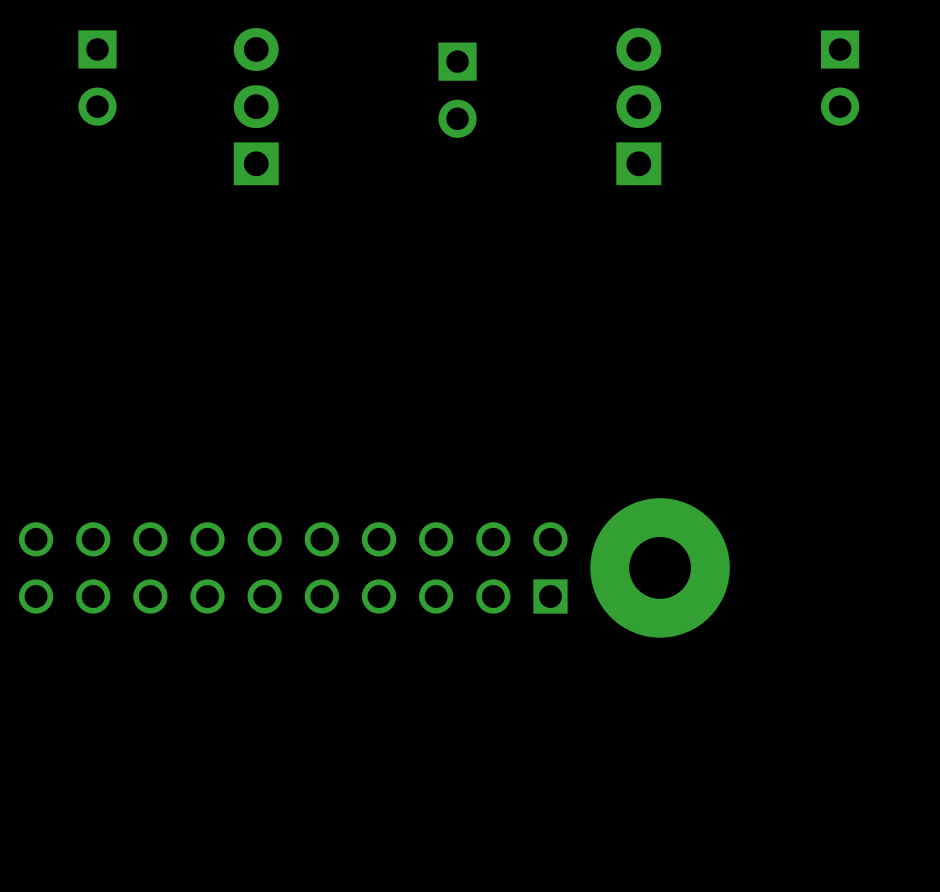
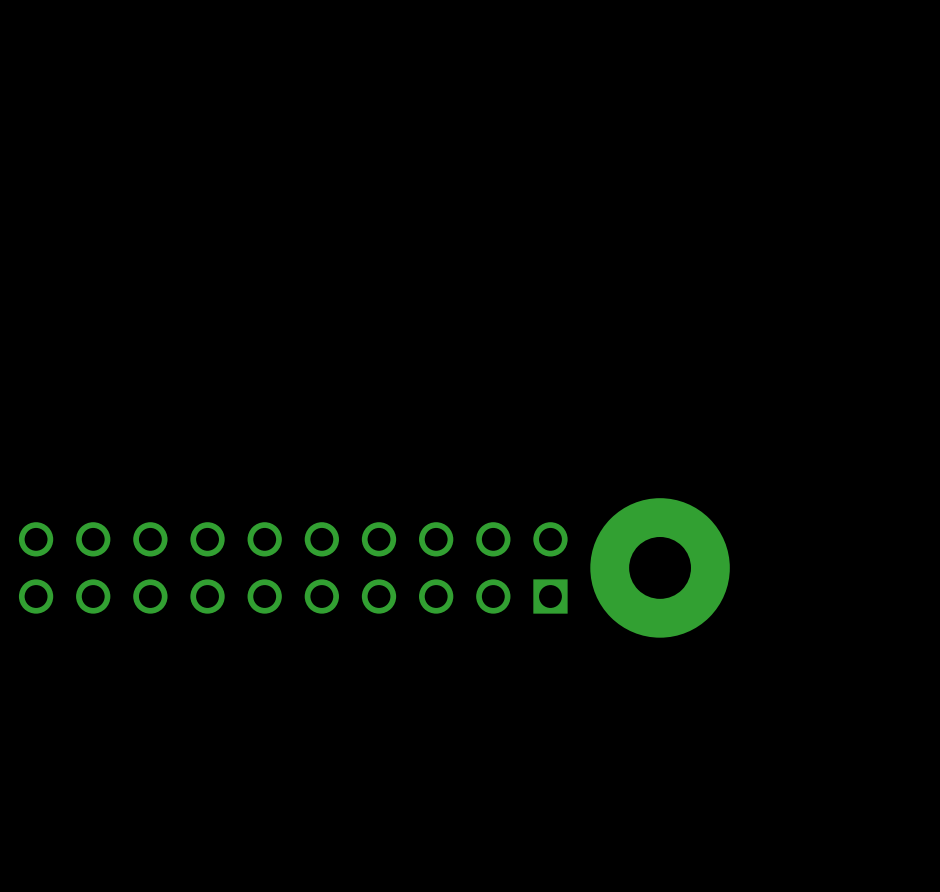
part: (97, 78) -> none
part: (840, 78) -> none
part: (457, 90) -> none
part: (256, 106) -> none
part: (638, 106) -> none

